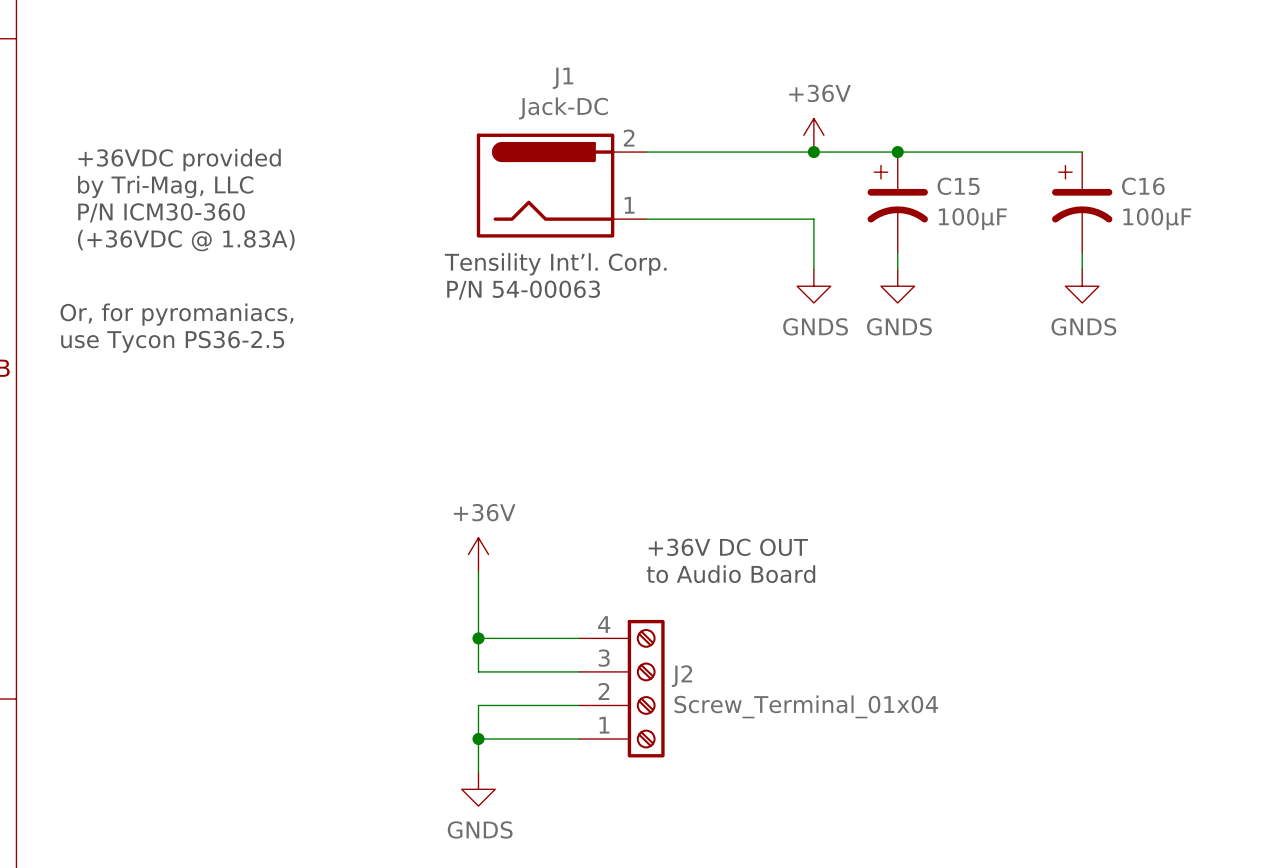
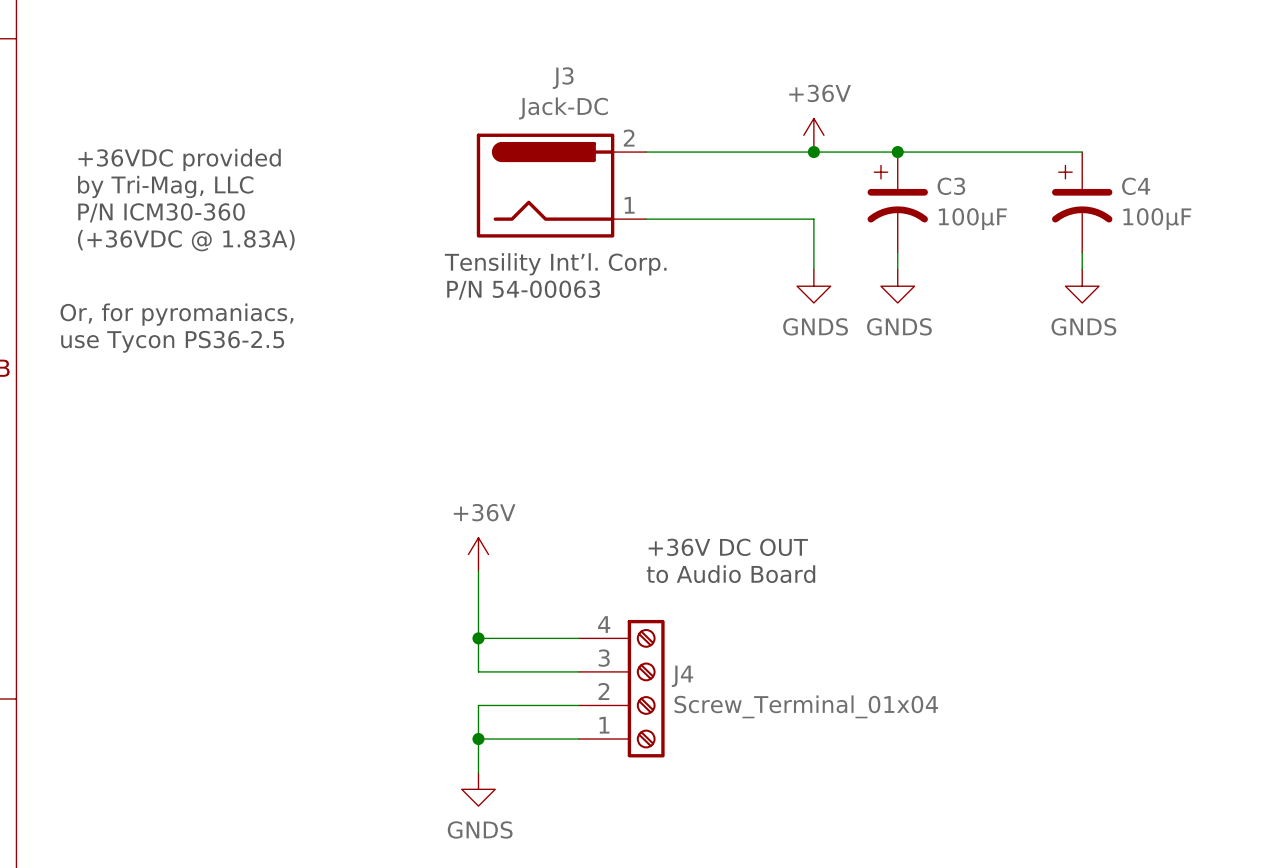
J1 name: J1 (563, 78) -> J3 (563, 78)
C15 name: C15 (958, 186) -> C3 (951, 186)
C16 name: C16 (1143, 186) -> C4 (1136, 186)
J2 name: J2 (681, 676) -> J4 (682, 676)

